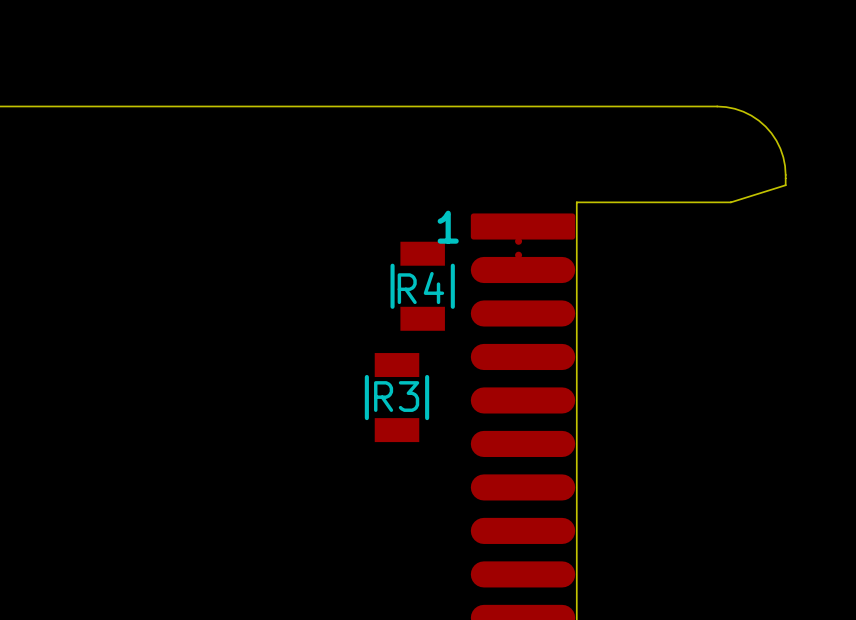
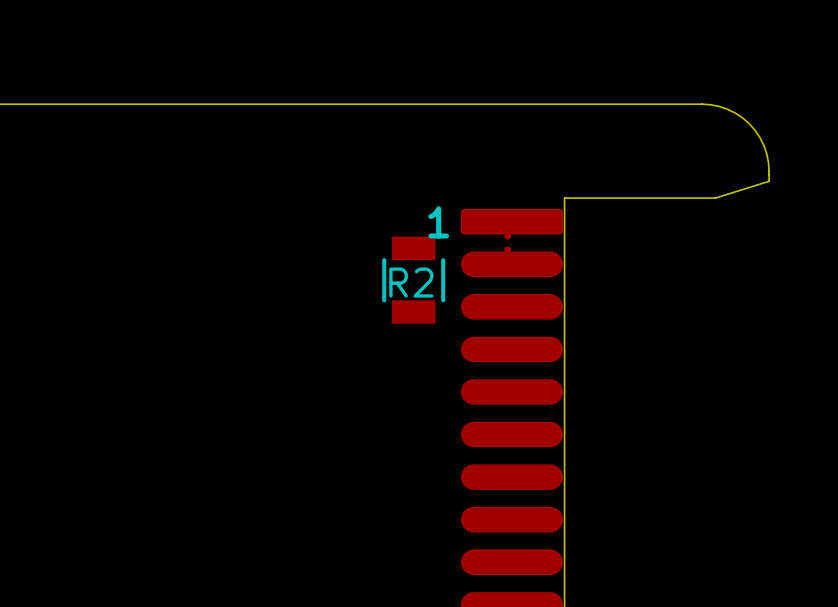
R4 name: R4 (420, 288) -> R2 (411, 282)
R3: (397, 397) -> none

